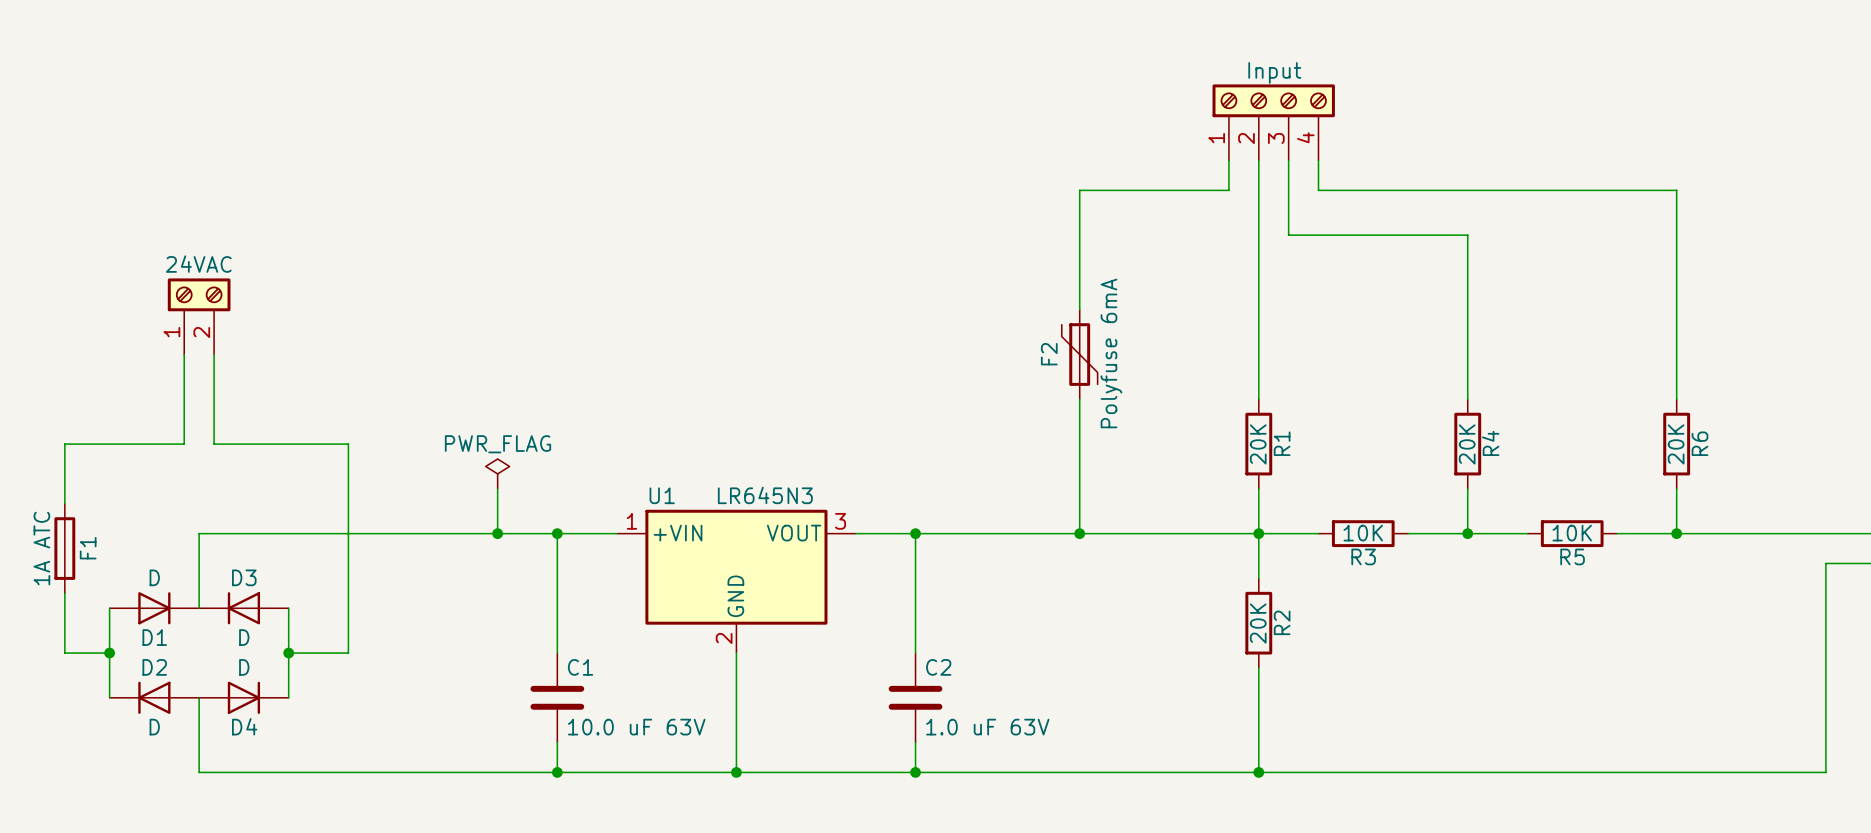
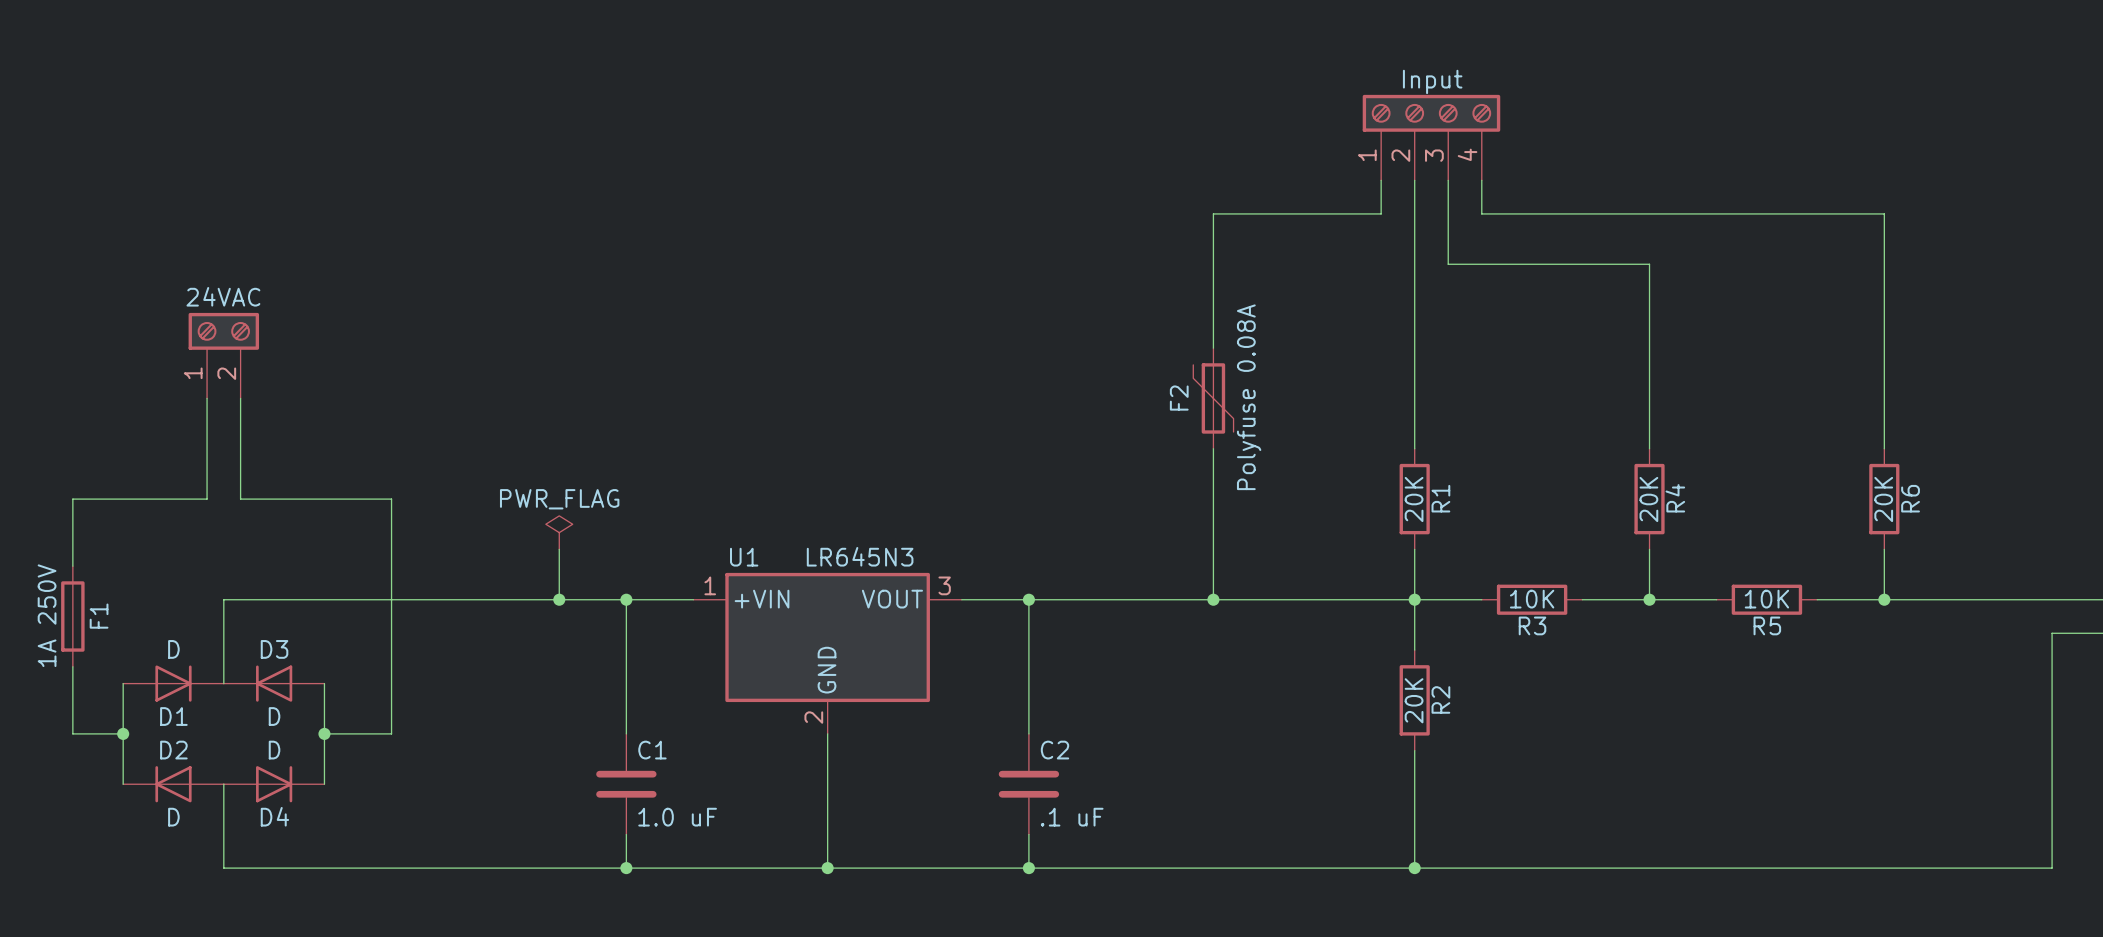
F2 value: Polyfuse 6mA (1111, 353) -> Polyfuse 0.08A (1249, 397)
F1 value: 1A ATC (41, 548) -> 1A 250V (47, 615)
C1 value: 10.0 uF 63V (636, 727) -> 1.0 uF (677, 817)
C2 value: 1.0 uF 63V (987, 727) -> .1 uF (1072, 817)

